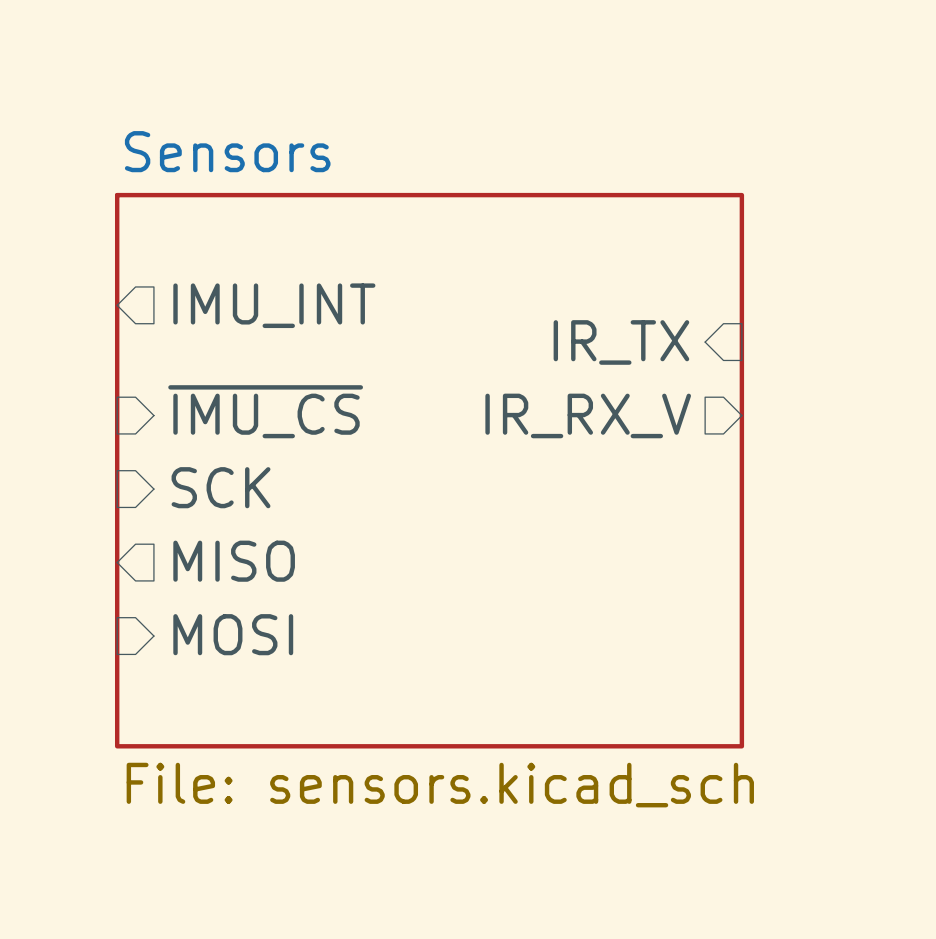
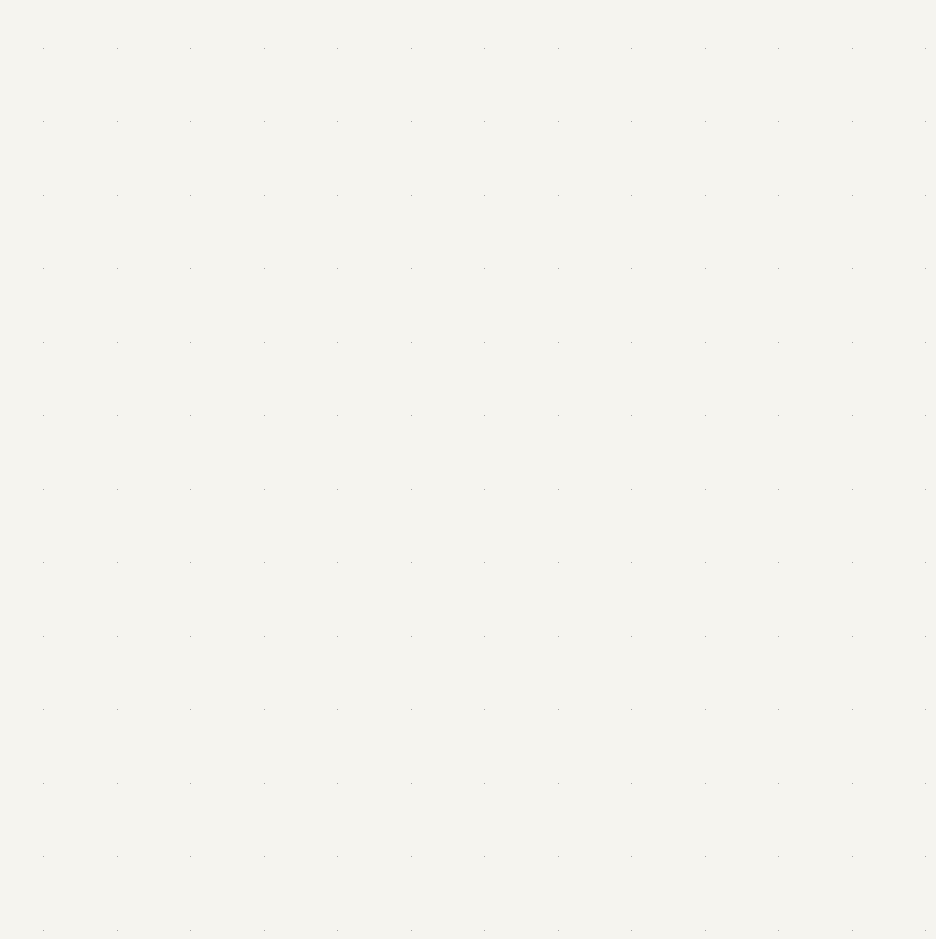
sheet pin: IMU_INT (274, 305) -> none
sheet pin: IR_TX (621, 342) -> none
sheet pin: ~{IMU_CS} (265, 411) -> none
sheet pin: IR_RX_V (588, 415) -> none
sheet Sensors: File: sensors.kicad_sch (429, 470) -> none
sheet pin: SCK (221, 487) -> none
sheet pin: MISO (234, 561) -> none
sheet pin: MOSI (233, 634) -> none

